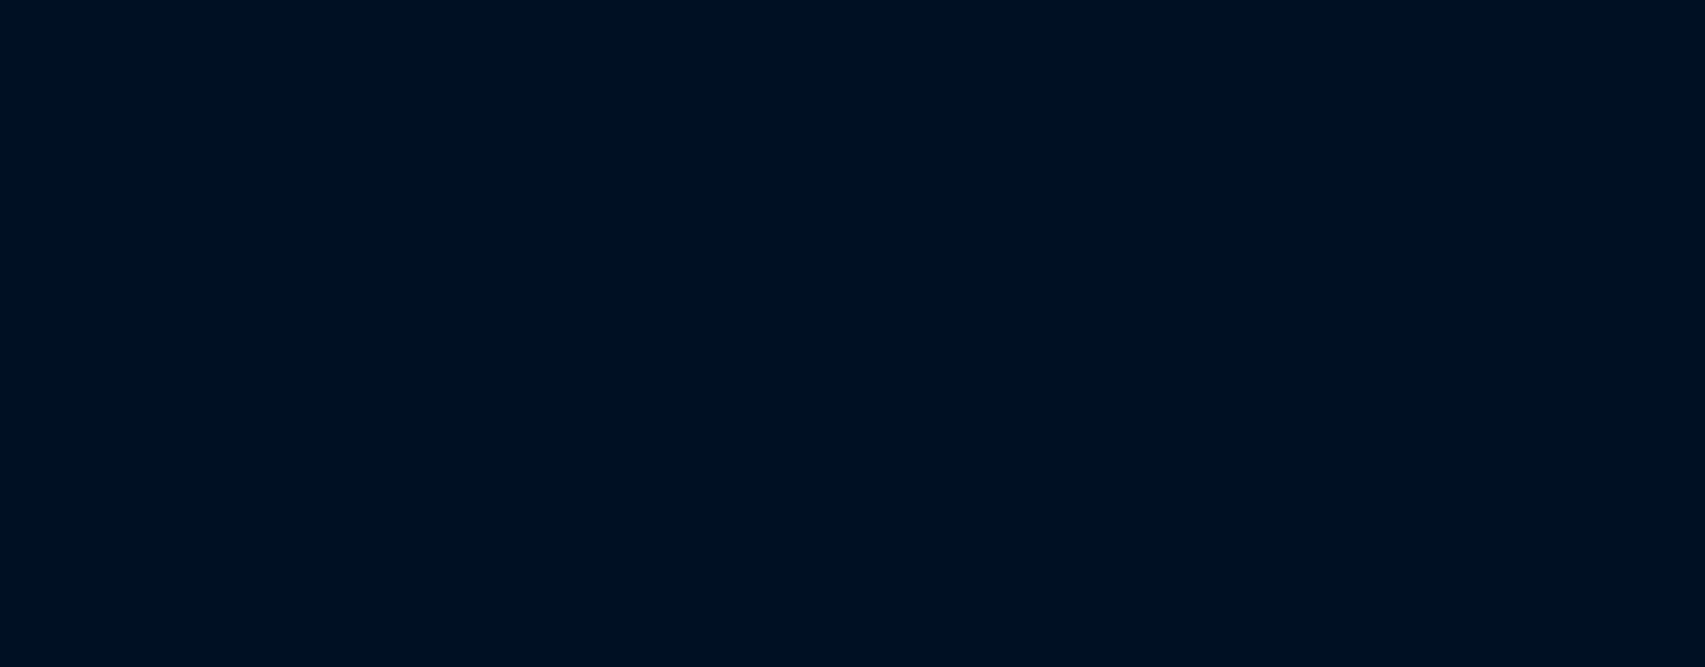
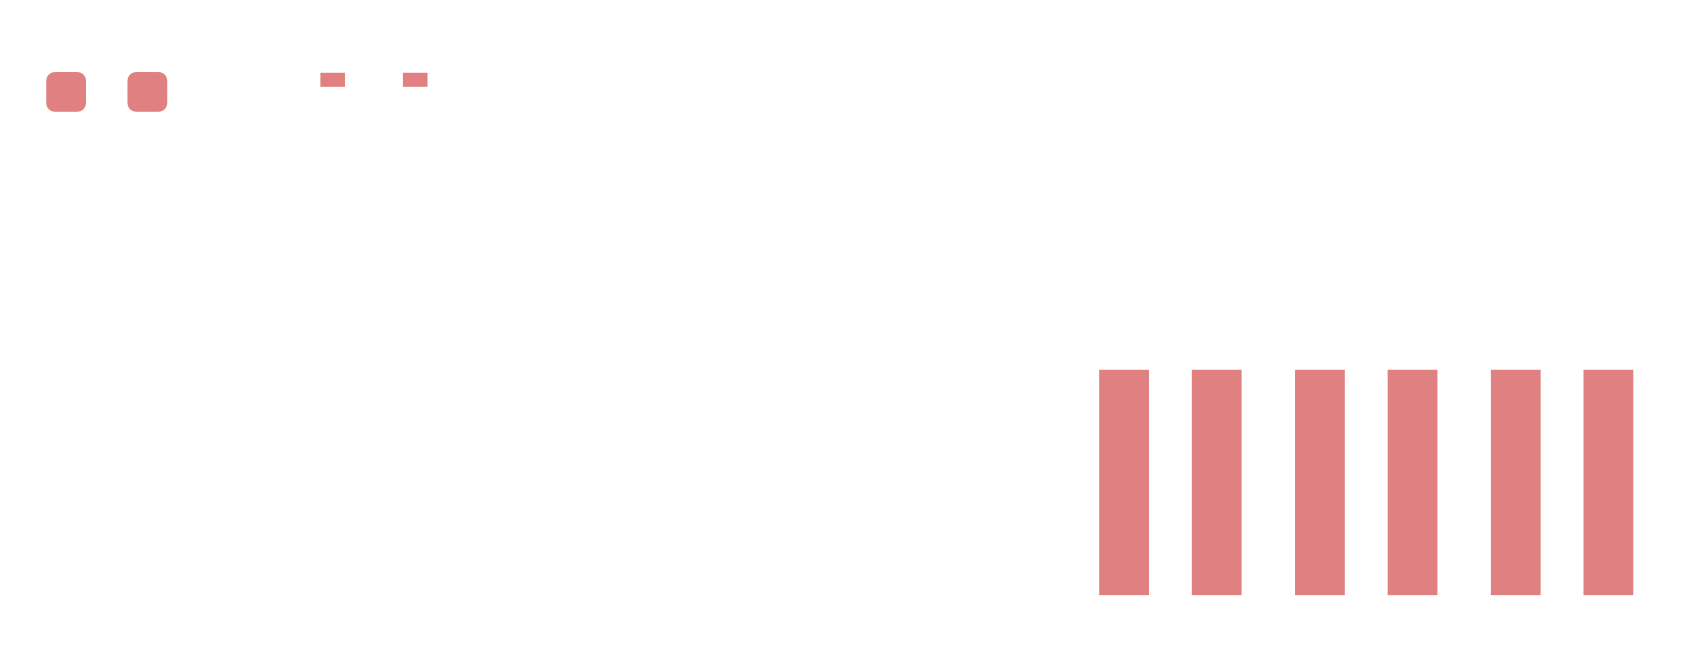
part: none -> (373, 79)
part: none -> (106, 91)
part: none -> (1170, 482)
part: none -> (1366, 482)
part: none -> (1562, 482)

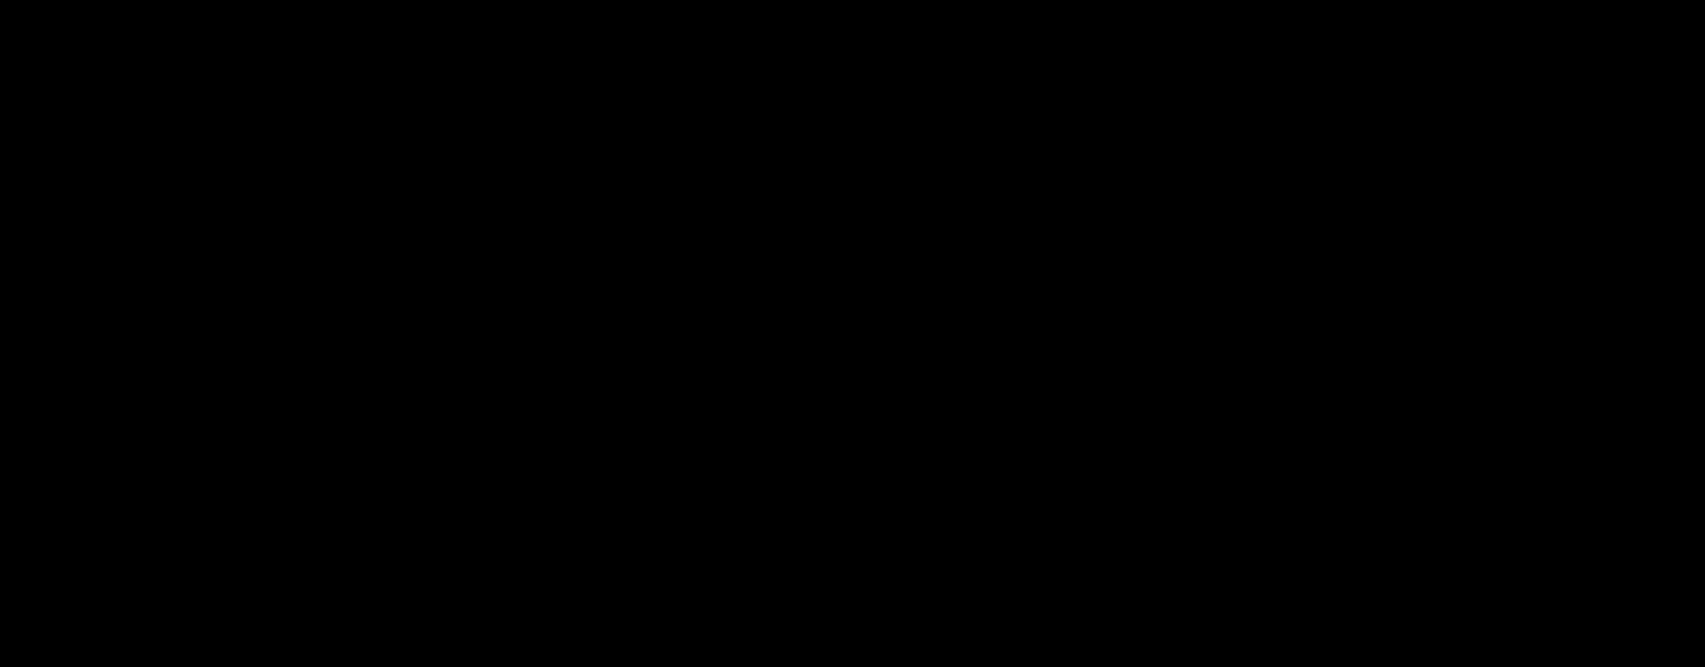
part: (373, 79) -> none
part: (106, 91) -> none
part: (1170, 482) -> none
part: (1366, 482) -> none
part: (1562, 482) -> none

